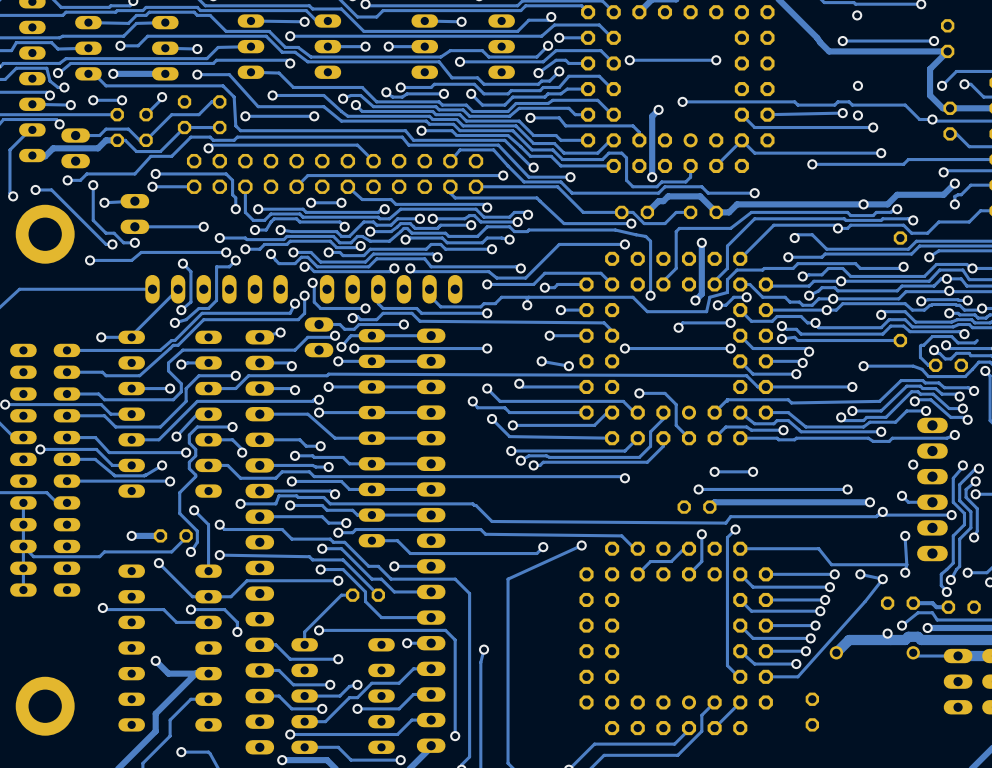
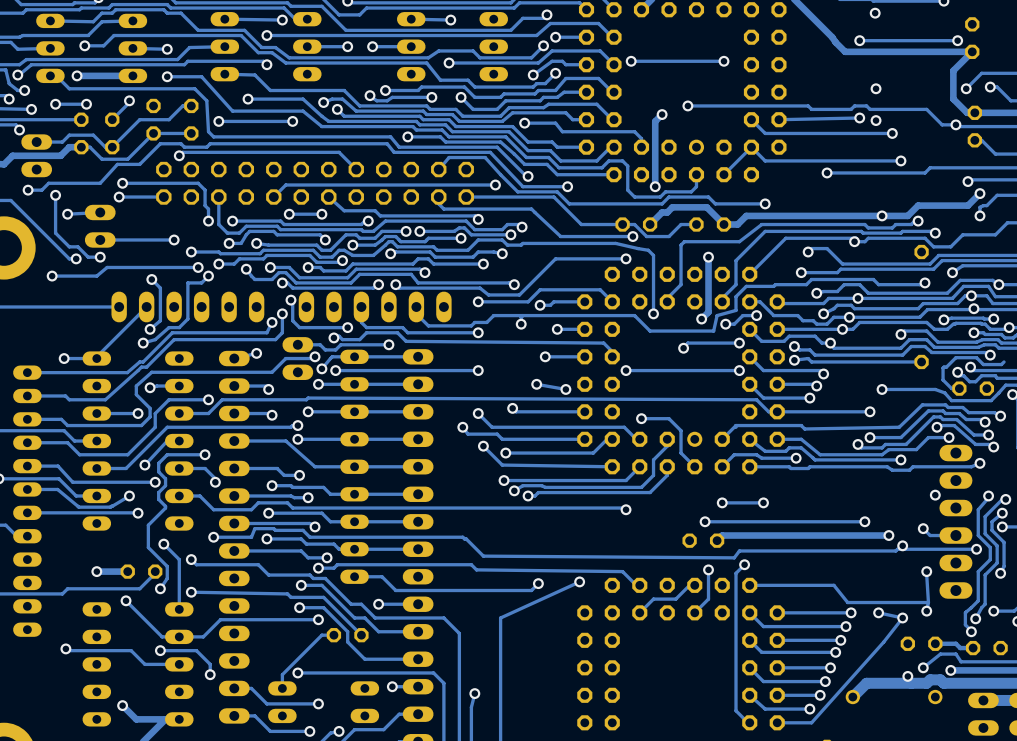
track: (913, 652) (916, 656) (958, 656) -> none

